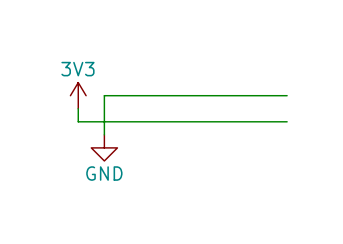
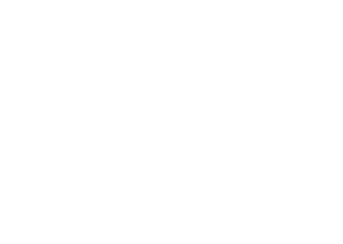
power symbol: 3V3 (78, 95) -> none
wire: (287, 95) (104, 95) (104, 134) -> none
wire: (78, 108) (78, 121) (287, 121) -> none
power symbol: GND (104, 147) -> none

